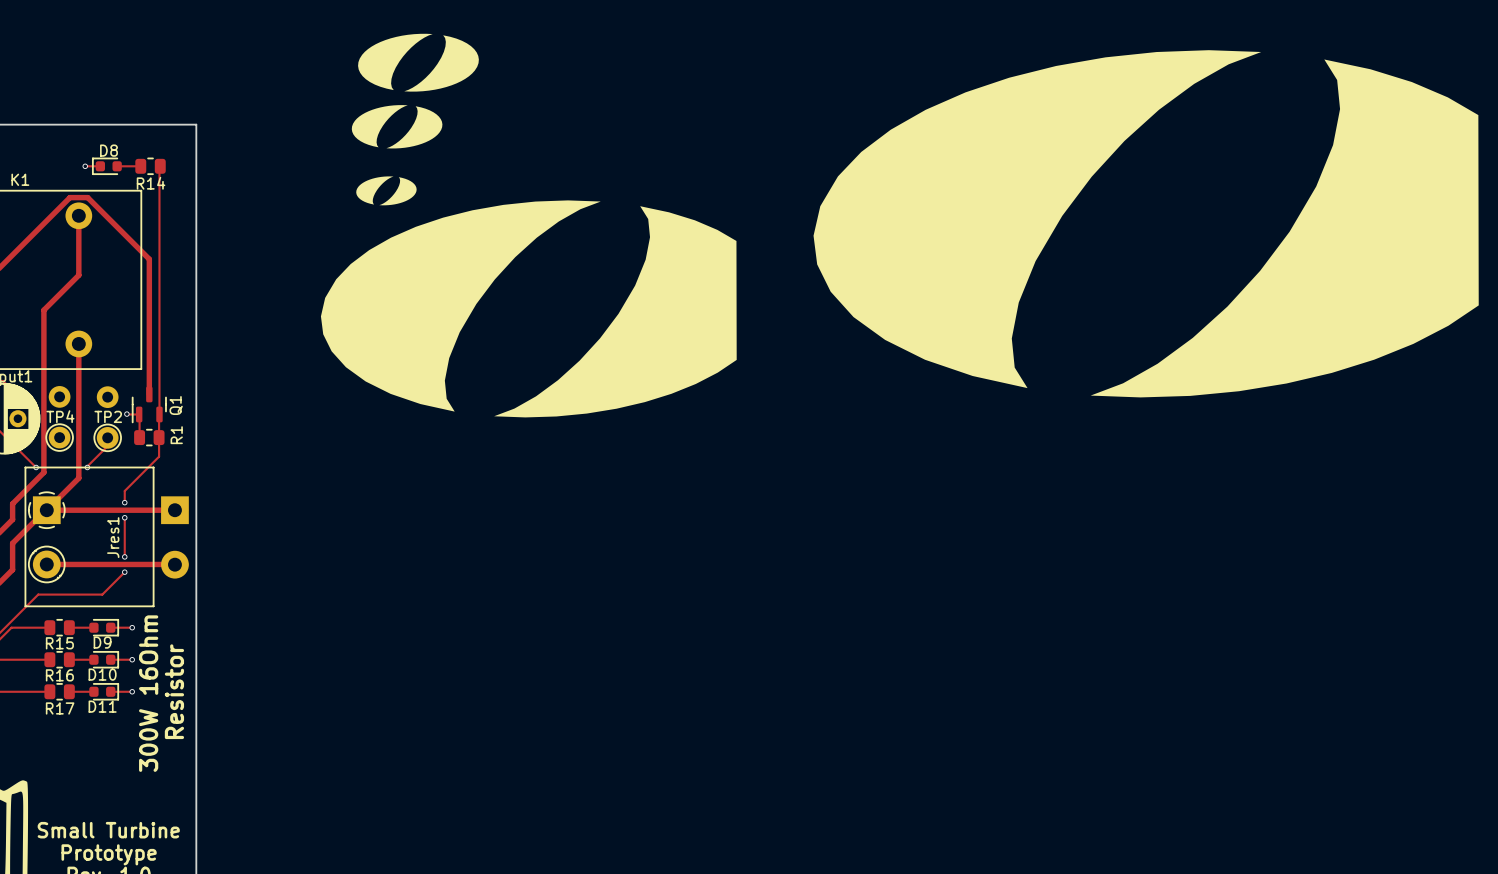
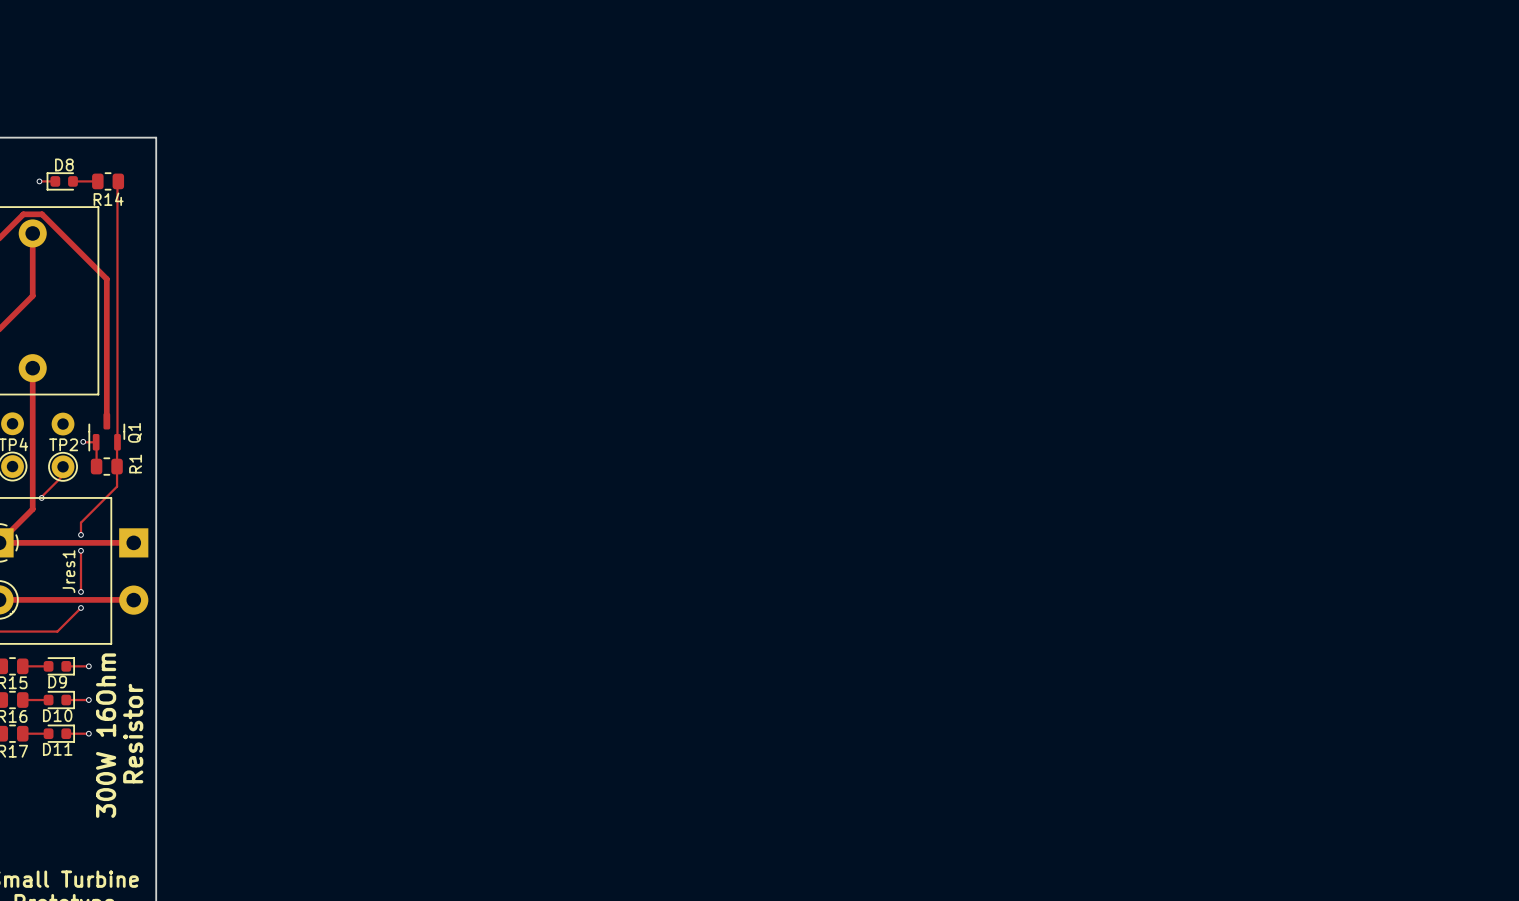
drawing: [358, 33, 479, 92] -> none
drawing: [813, 50, 1479, 398] -> none
drawing: [351, 105, 443, 149] -> none
drawing: [320, 176, 737, 418] -> none

